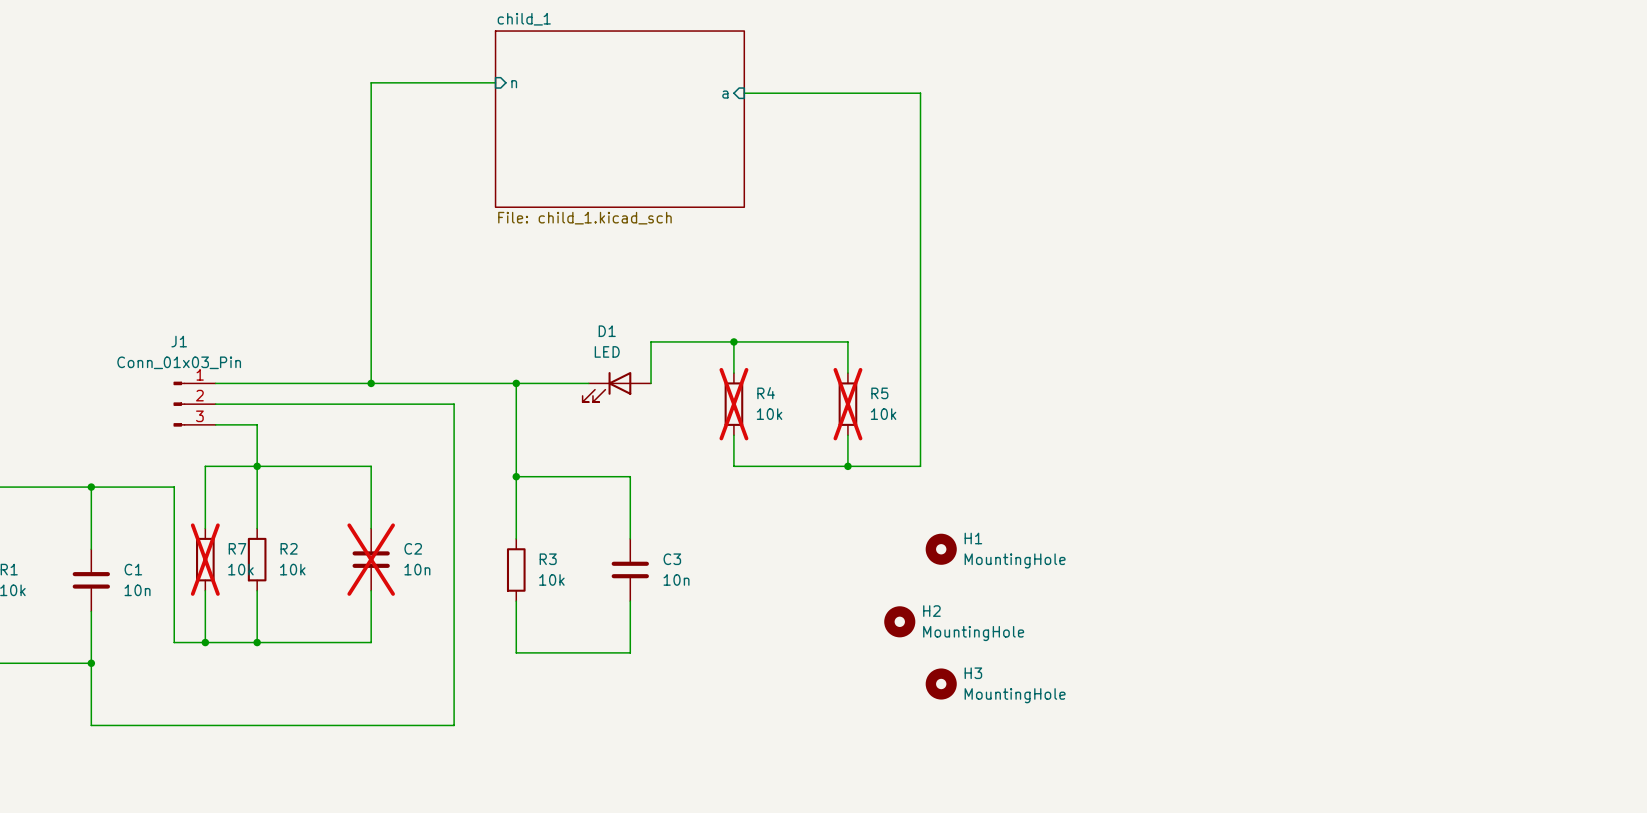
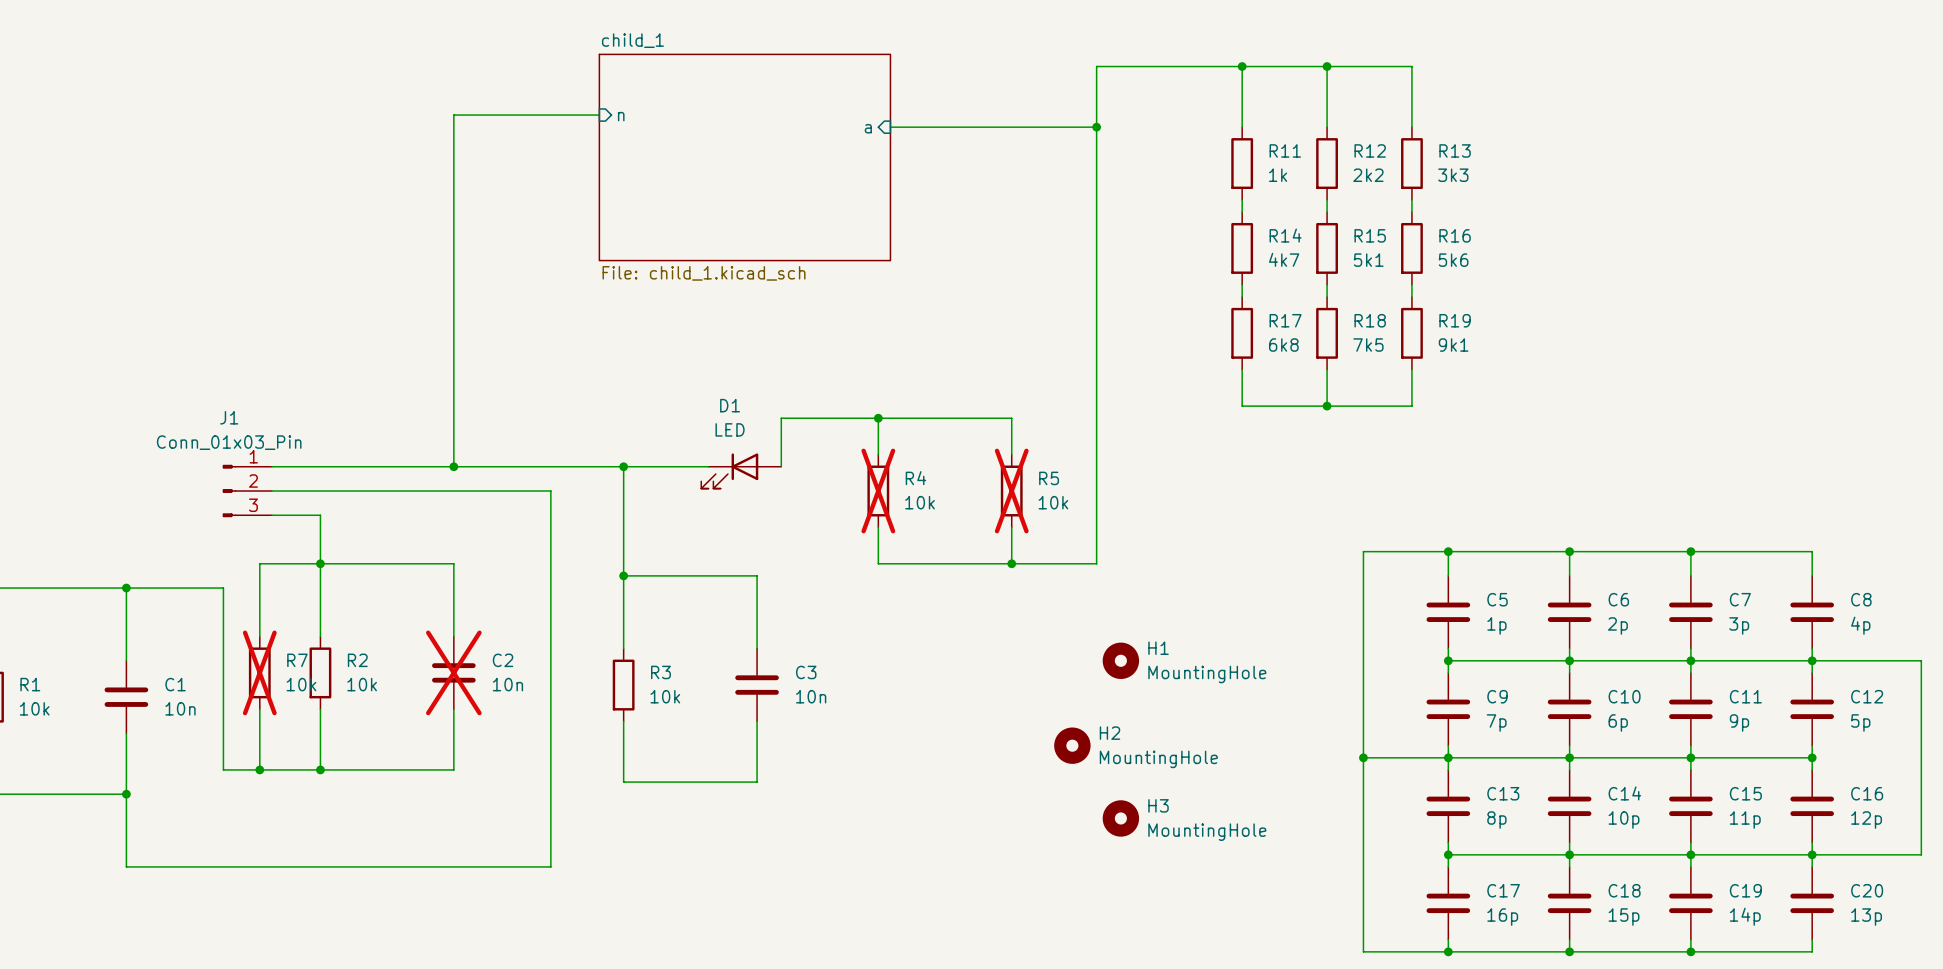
wire: none -> (1242, 66) (1242, 127)
junction: none -> (1242, 66)
wire: none -> (1327, 66) (1327, 127)
junction: none -> (1327, 66)
wire: none -> (1096, 127) (1096, 66) (1411, 66) (1411, 127)
junction: none -> (1096, 127)
R11: none -> 1k (1242, 163)
R12: none -> 2k2 (1327, 163)
R13: none -> 3k3 (1411, 163)
wire: none -> (1242, 199) (1242, 212)
wire: none -> (1327, 199) (1327, 212)
wire: none -> (1411, 199) (1411, 212)
R14: none -> 4k7 (1242, 248)
R15: none -> 5k1 (1327, 248)
R16: none -> 5k6 (1411, 248)
wire: none -> (1242, 284) (1242, 296)
wire: none -> (1327, 284) (1327, 296)
wire: none -> (1411, 284) (1411, 296)
R17: none -> 6k8 (1242, 333)
R18: none -> 7k5 (1327, 333)
R19: none -> 9k1 (1411, 333)
wire: none -> (1242, 369) (1242, 406) (1411, 406) (1411, 369)
wire: none -> (1327, 369) (1327, 406)
junction: none -> (1327, 406)
wire: none -> (1448, 551) (1448, 575)
junction: none -> (1448, 551)
wire: none -> (1569, 551) (1569, 575)
junction: none -> (1569, 551)
wire: none -> (1690, 551) (1690, 575)
junction: none -> (1690, 551)
wire: none -> (1812, 575) (1812, 551) (1363, 551) (1363, 951) (1812, 951) (1812, 939)
C5: none -> 1p (1448, 612)
C6: none -> 2p (1569, 612)
C7: none -> 3p (1690, 612)
C8: none -> 4p (1812, 612)
wire: none -> (1448, 648) (1448, 672)
wire: none -> (1569, 648) (1569, 672)
wire: none -> (1690, 648) (1690, 672)
wire: none -> (1812, 648) (1812, 672)
wire: none -> (1448, 660) (1921, 660) (1921, 854) (1448, 854)
junction: none -> (1448, 660)
junction: none -> (1569, 660)
junction: none -> (1690, 660)
junction: none -> (1812, 660)
C9: none -> 7p (1448, 709)
C10: none -> 6p (1569, 709)
C11: none -> 9p (1690, 709)
C12: none -> 5p (1812, 709)
wire: none -> (1448, 745) (1448, 769)
wire: none -> (1569, 745) (1569, 769)
wire: none -> (1690, 745) (1690, 769)
wire: none -> (1812, 745) (1812, 769)
wire: none -> (1363, 757) (1812, 757)
junction: none -> (1363, 757)
junction: none -> (1448, 757)
junction: none -> (1569, 757)
junction: none -> (1690, 757)
junction: none -> (1812, 757)
C13: none -> 8p (1448, 806)
C14: none -> 10p (1569, 806)
C15: none -> 11p (1690, 806)
C16: none -> 12p (1812, 806)
wire: none -> (1448, 842) (1448, 866)
wire: none -> (1569, 842) (1569, 866)
wire: none -> (1690, 842) (1690, 866)
wire: none -> (1812, 842) (1812, 866)
junction: none -> (1448, 854)
junction: none -> (1569, 854)
junction: none -> (1690, 854)
junction: none -> (1812, 854)
C17: none -> 16p (1448, 903)
C18: none -> 15p (1569, 903)
C19: none -> 14p (1690, 903)
C20: none -> 13p (1812, 903)
wire: none -> (1448, 939) (1448, 951)
wire: none -> (1569, 939) (1569, 951)
wire: none -> (1690, 939) (1690, 951)
junction: none -> (1448, 951)
junction: none -> (1569, 951)
junction: none -> (1690, 951)

